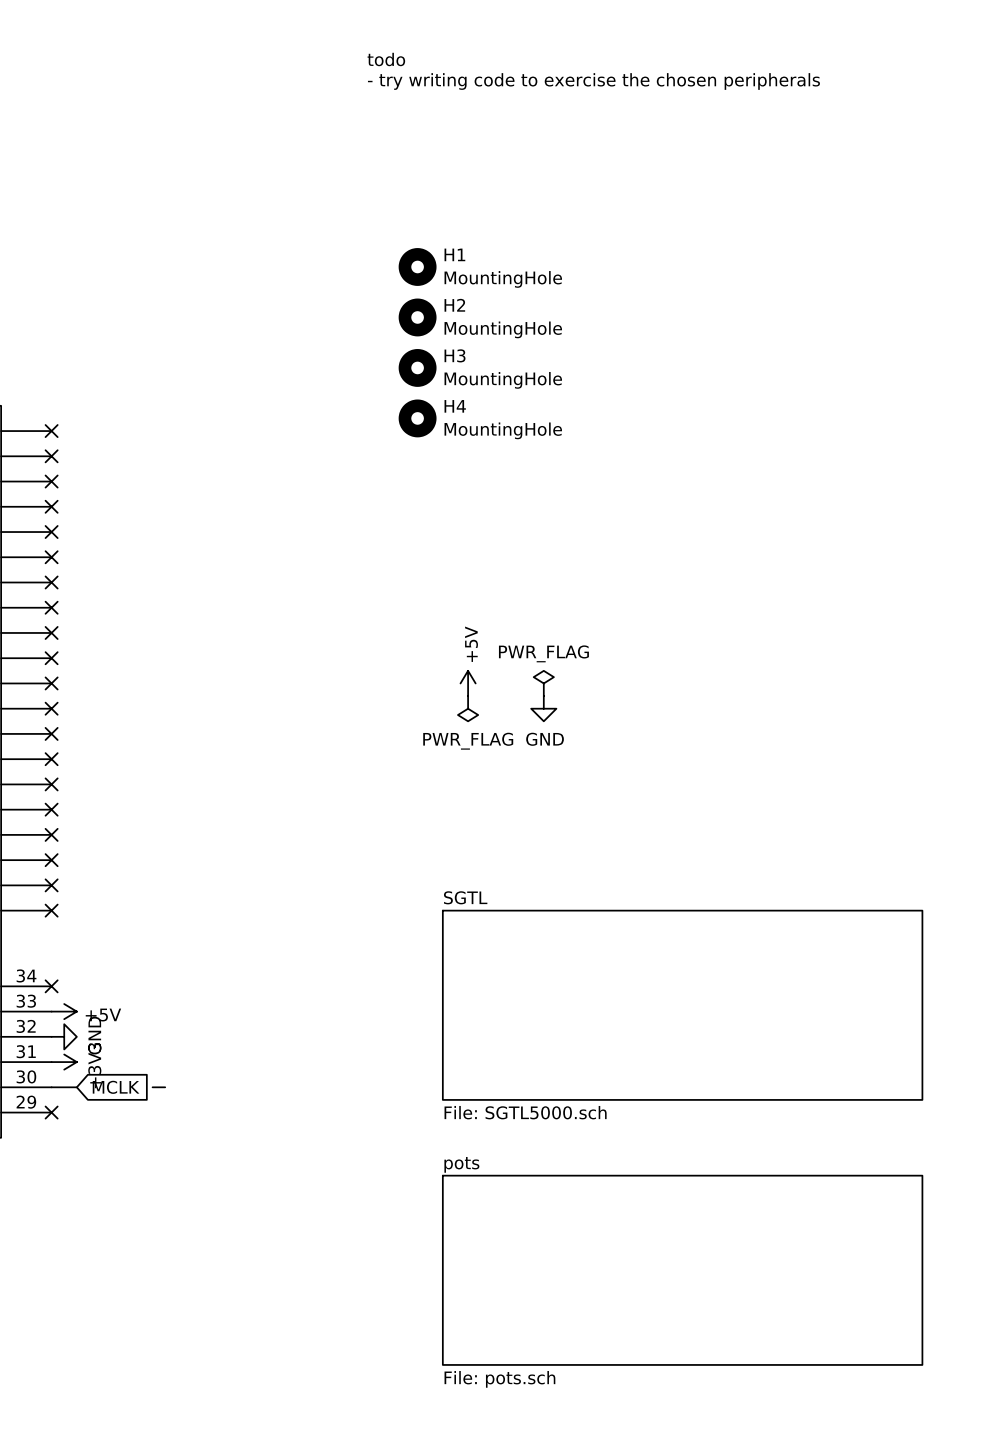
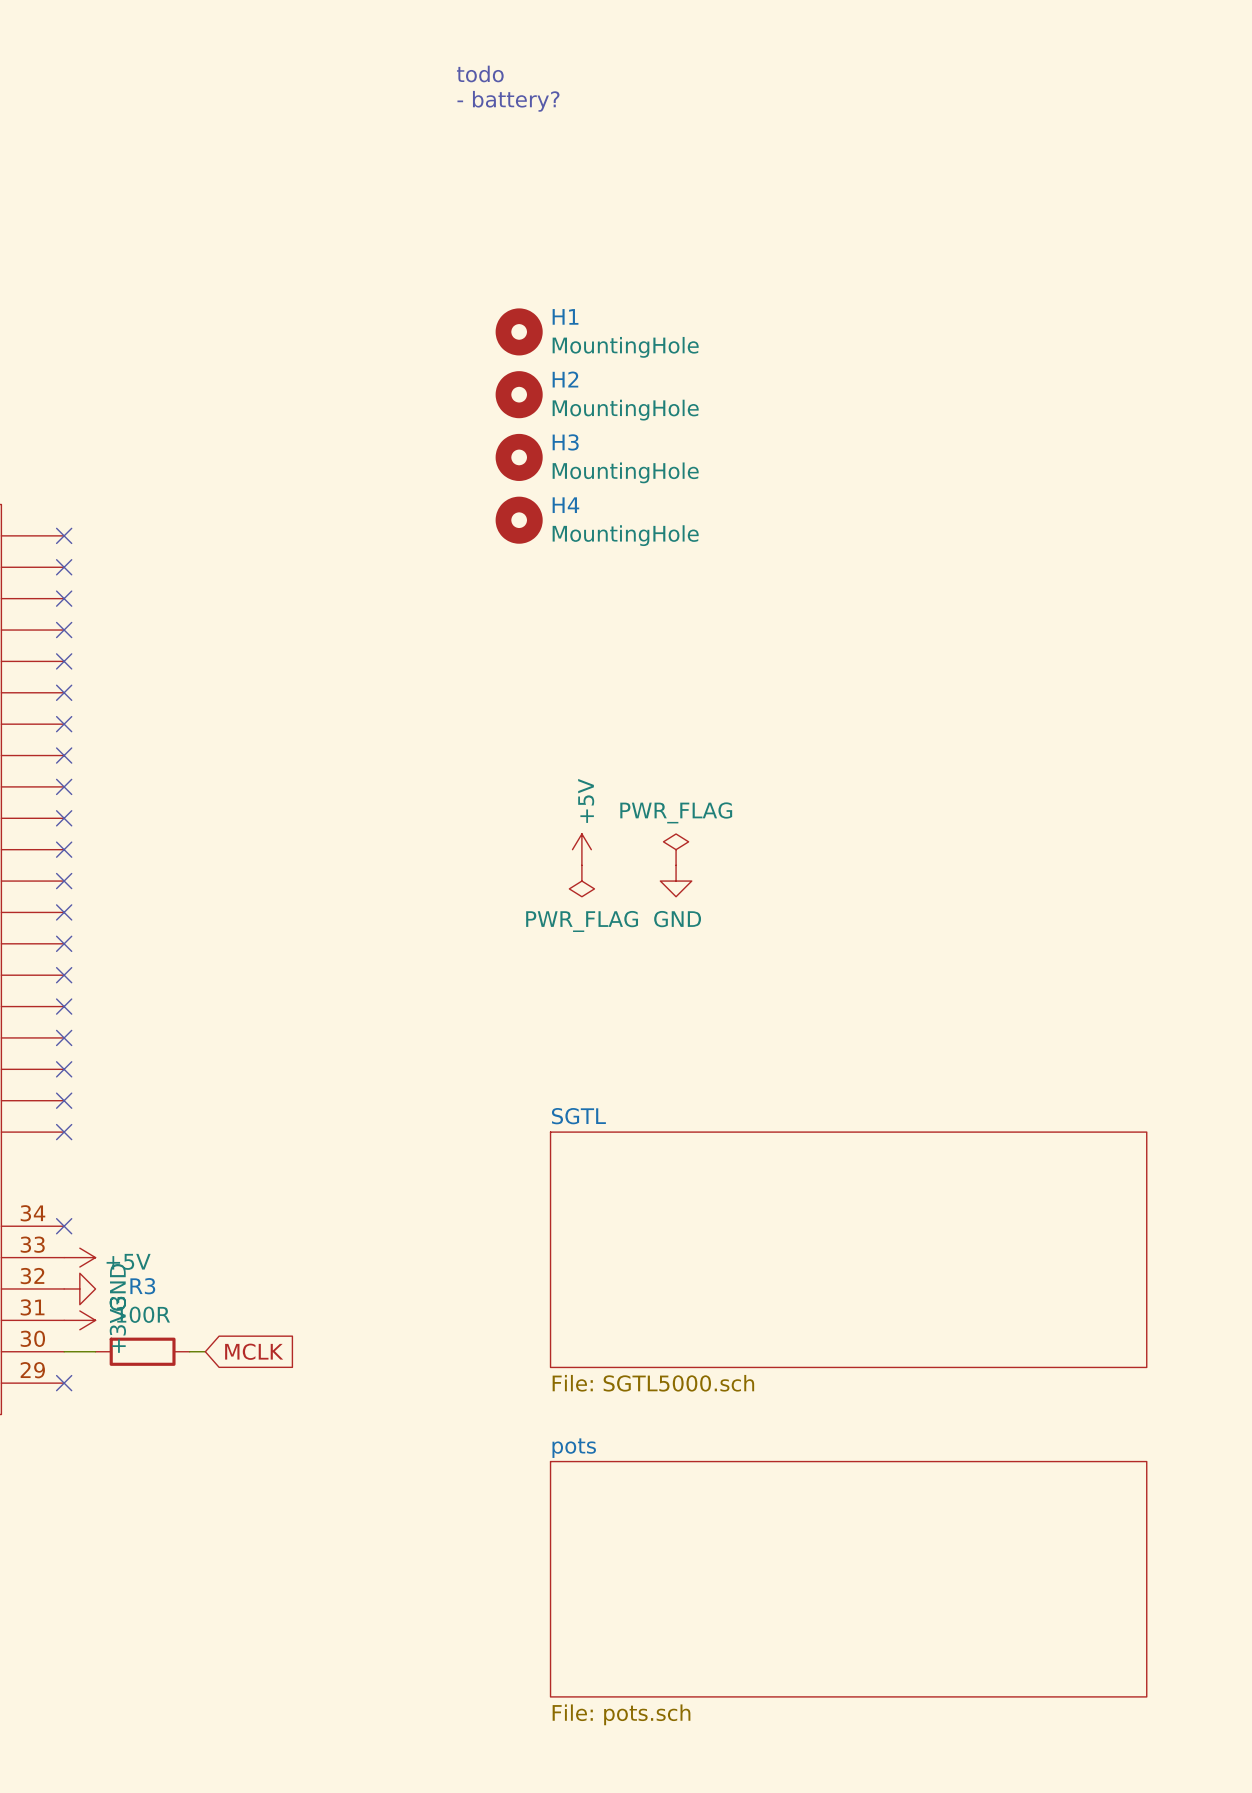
text: - try writing code to exercise the chosen peripherals (593, 81) -> - battery? (508, 101)
R3: none -> 100R (142, 1351)
global label position: MCLK (116, 1087) -> MCLK (254, 1351)

